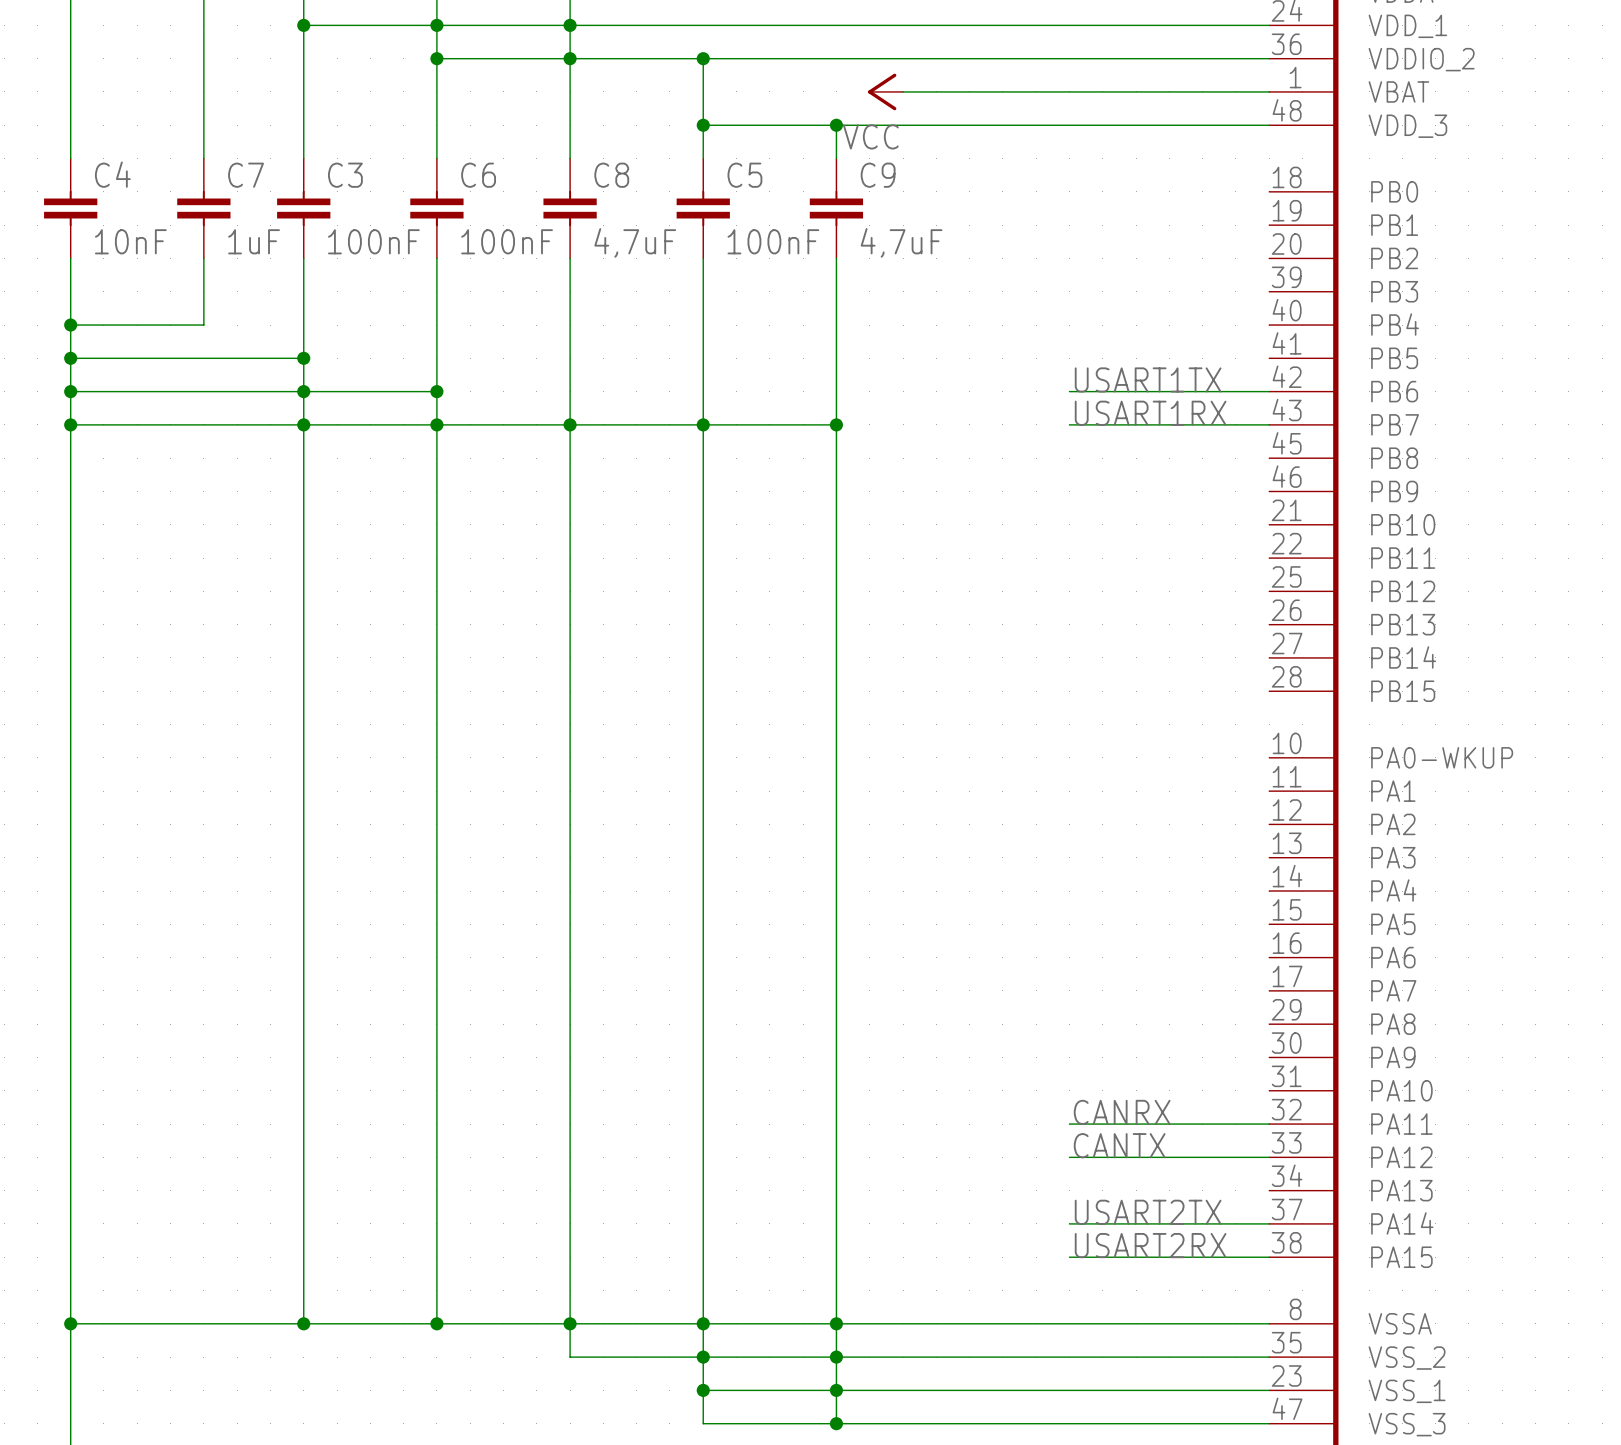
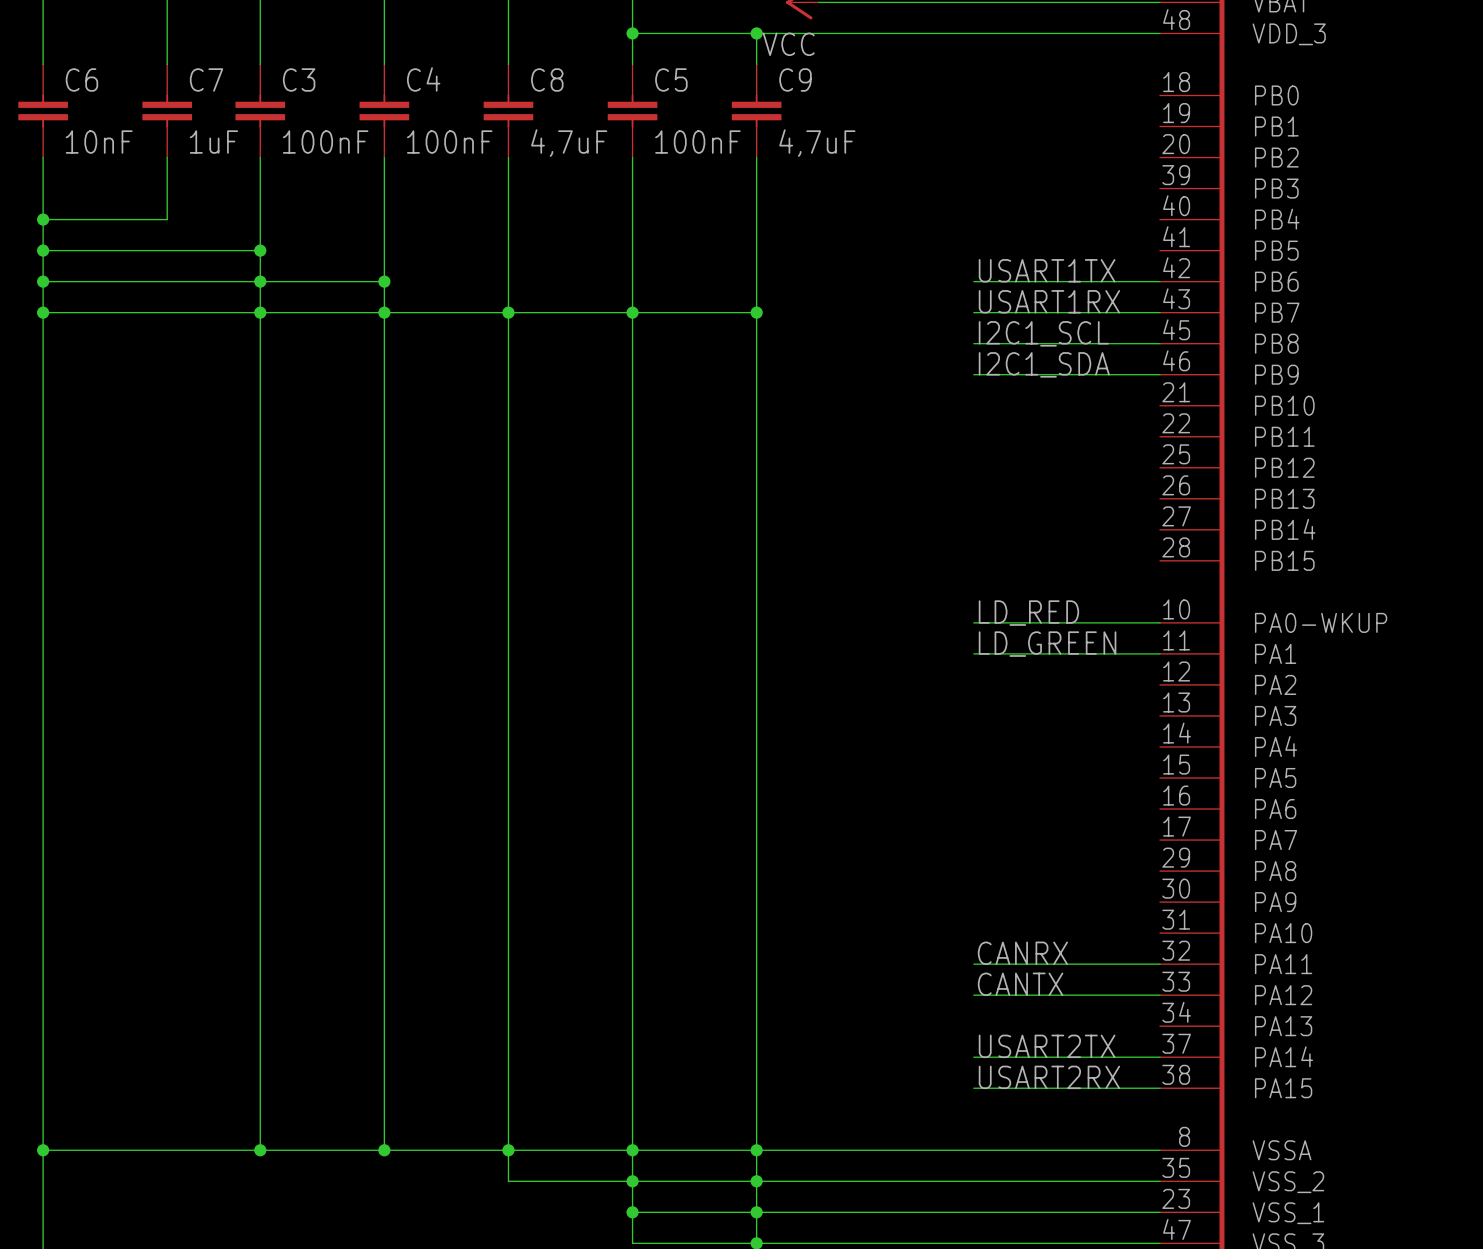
C4 name: C4 (112, 174) -> C6 (81, 79)
C6 name: C6 (478, 175) -> C4 (423, 79)
label: none -> I2C1_SCL (1043, 333)
wire: none -> (973, 343) (1159, 343)
label: none -> I2C1_SDA (1044, 364)
wire: none -> (973, 374) (1159, 374)
label: none -> LD_RED (1028, 613)
wire: none -> (973, 622) (1159, 622)
label: none -> LD_GREEN (1047, 644)
wire: none -> (973, 653) (1159, 653)

